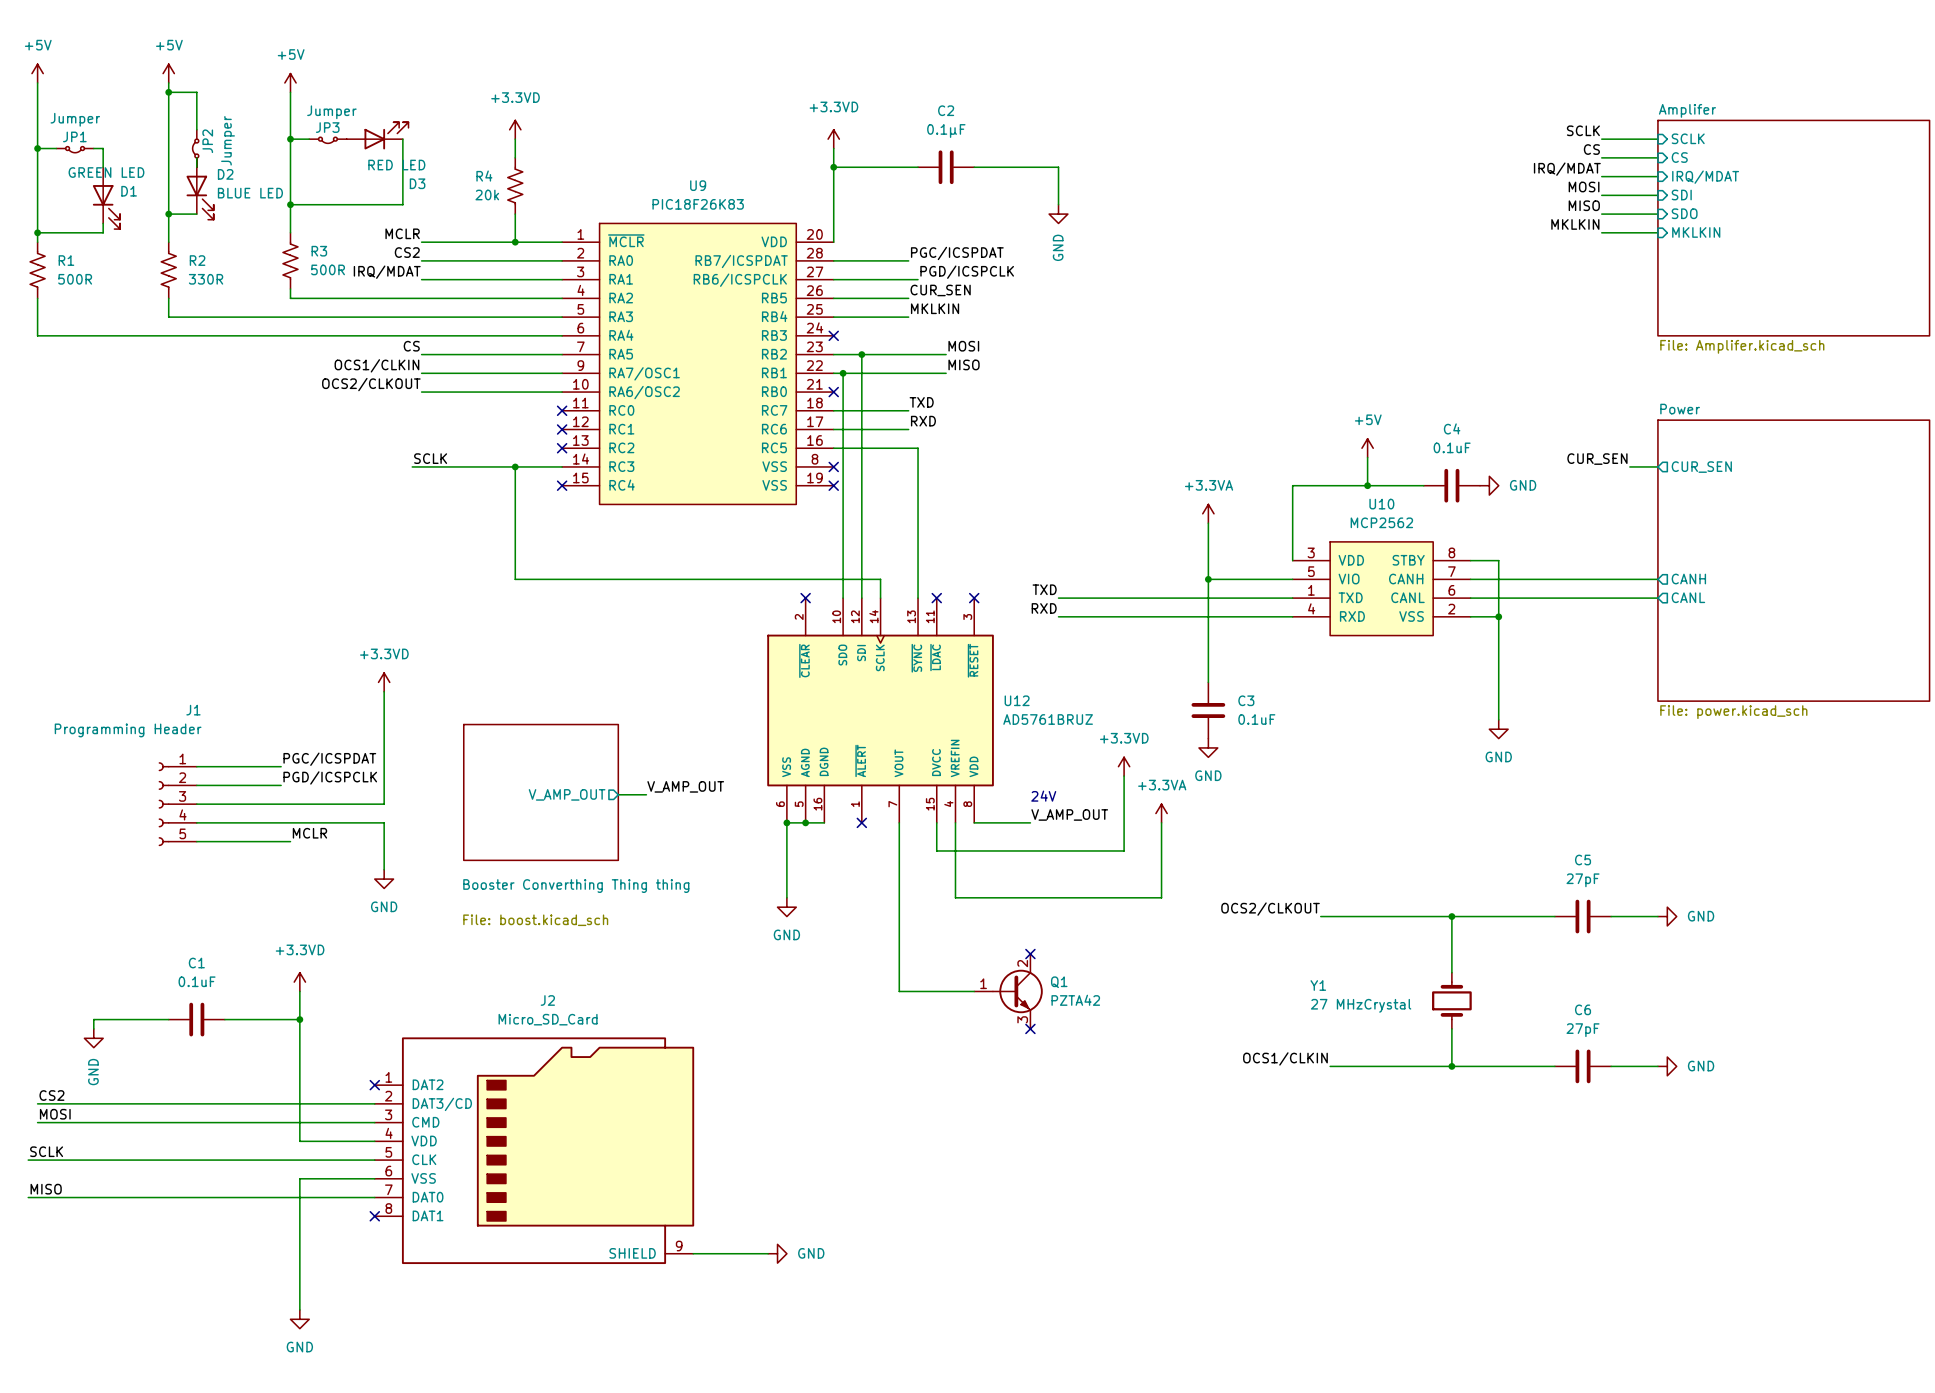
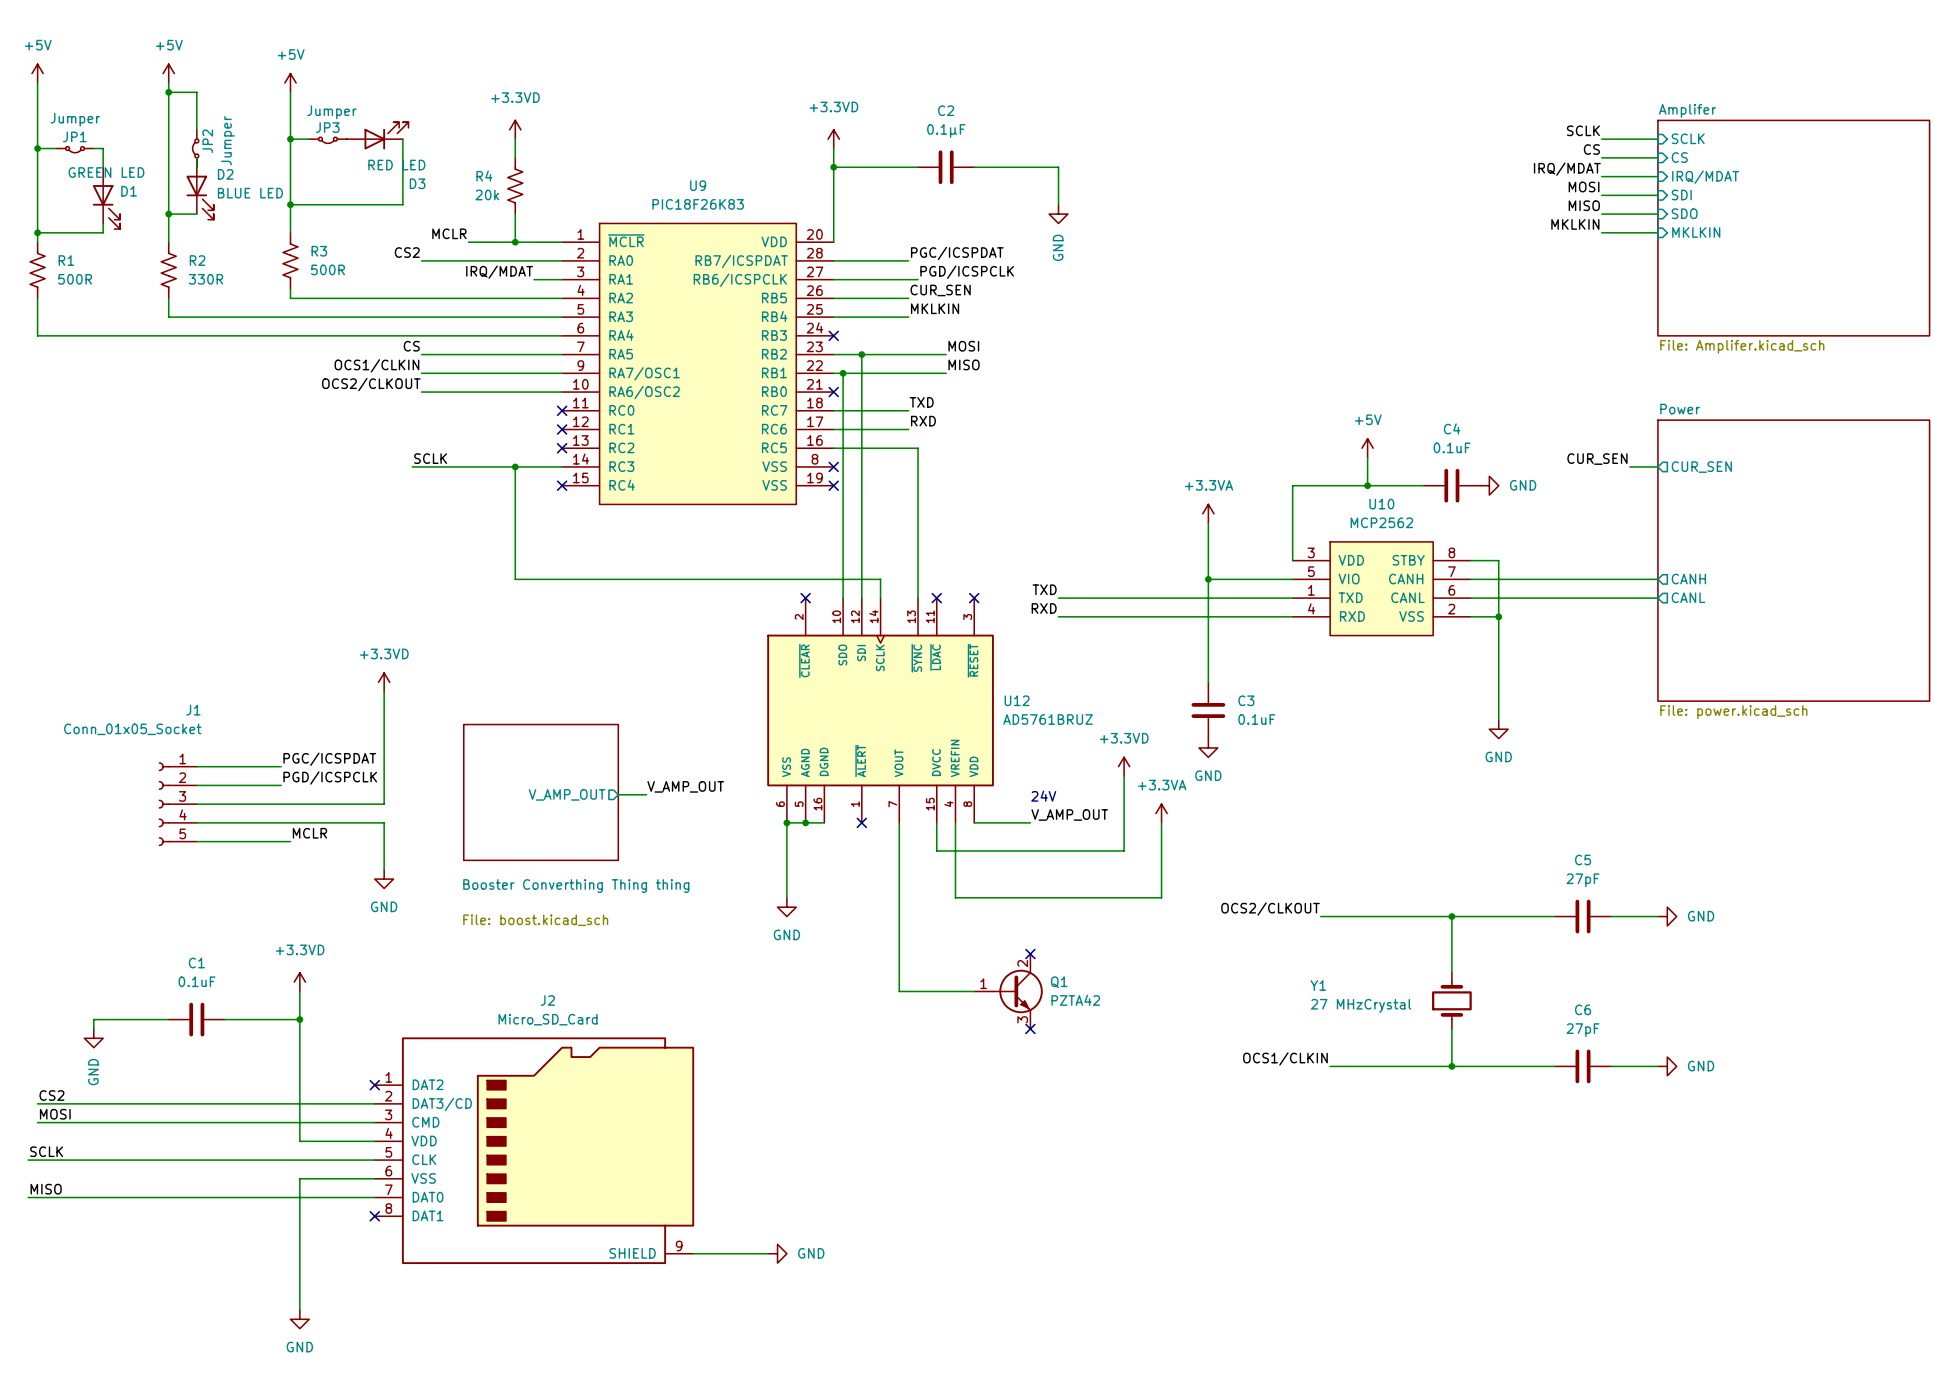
label position: MCLR (402, 233) -> MCLR (449, 233)
wire: (421, 242) (468, 242) -> none
label position: IRQ/MDAT (387, 272) -> IRQ/MDAT (499, 272)
wire: (421, 279) (534, 279) -> none
J1 value: Programming Header (128, 730) -> Conn_01x05_Socket (132, 729)

